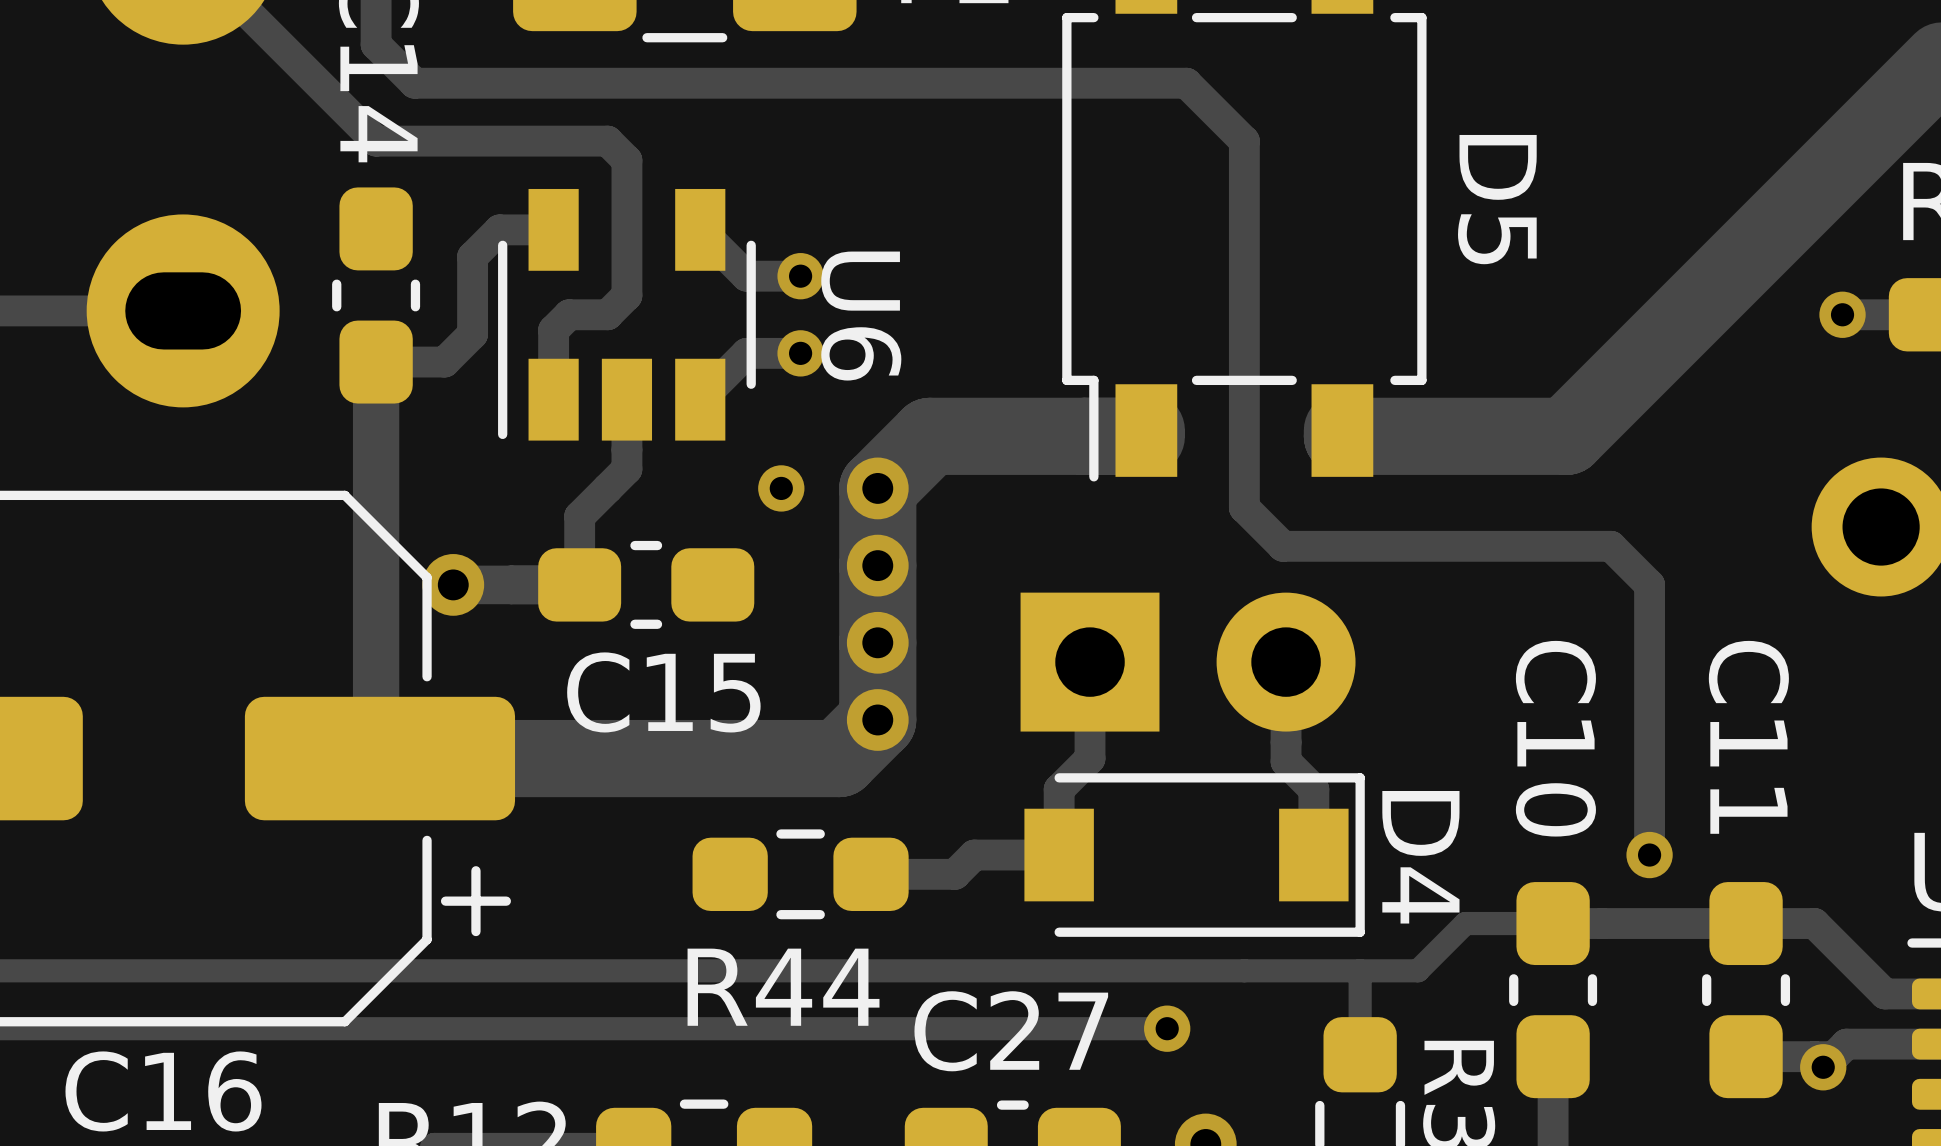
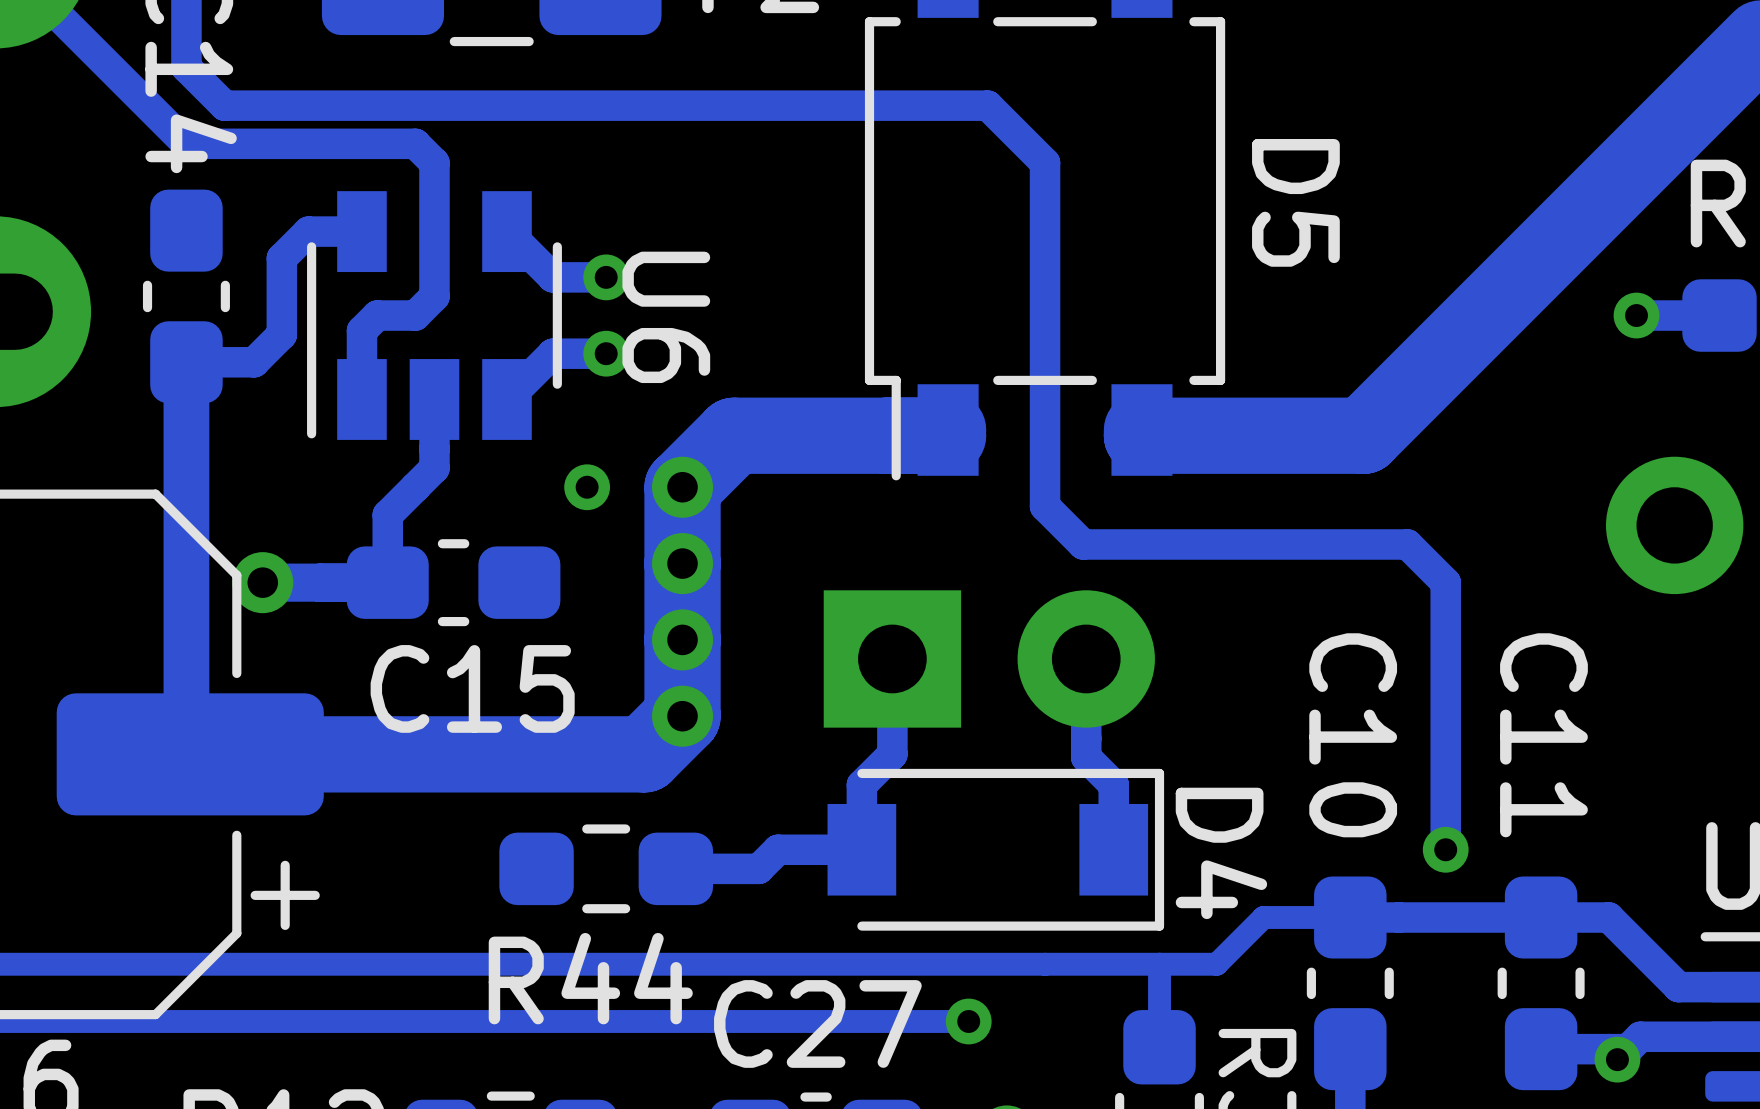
track: (376, 44) (414, 83) (1186, 83) (1244, 141) (1244, 160) -> (186, 48) (186, 67) (224, 105) (987, 105) (1045, 162)

